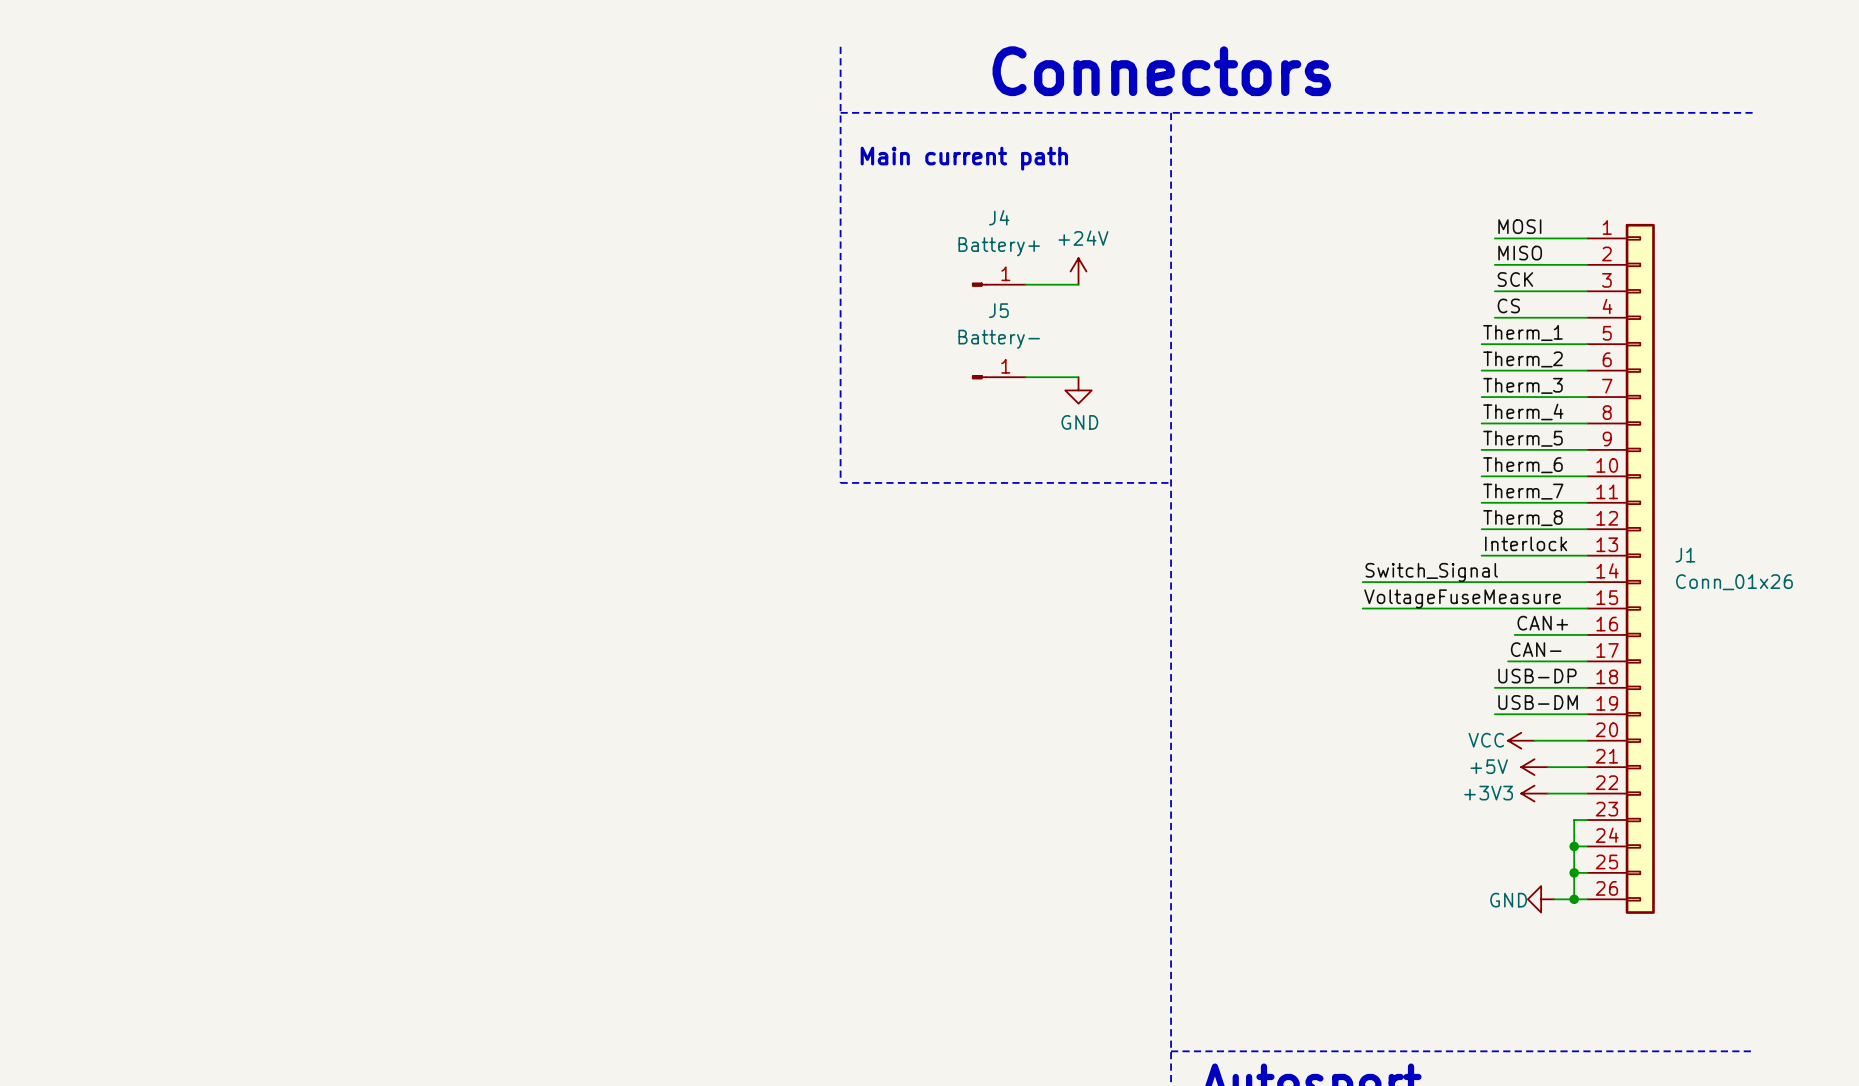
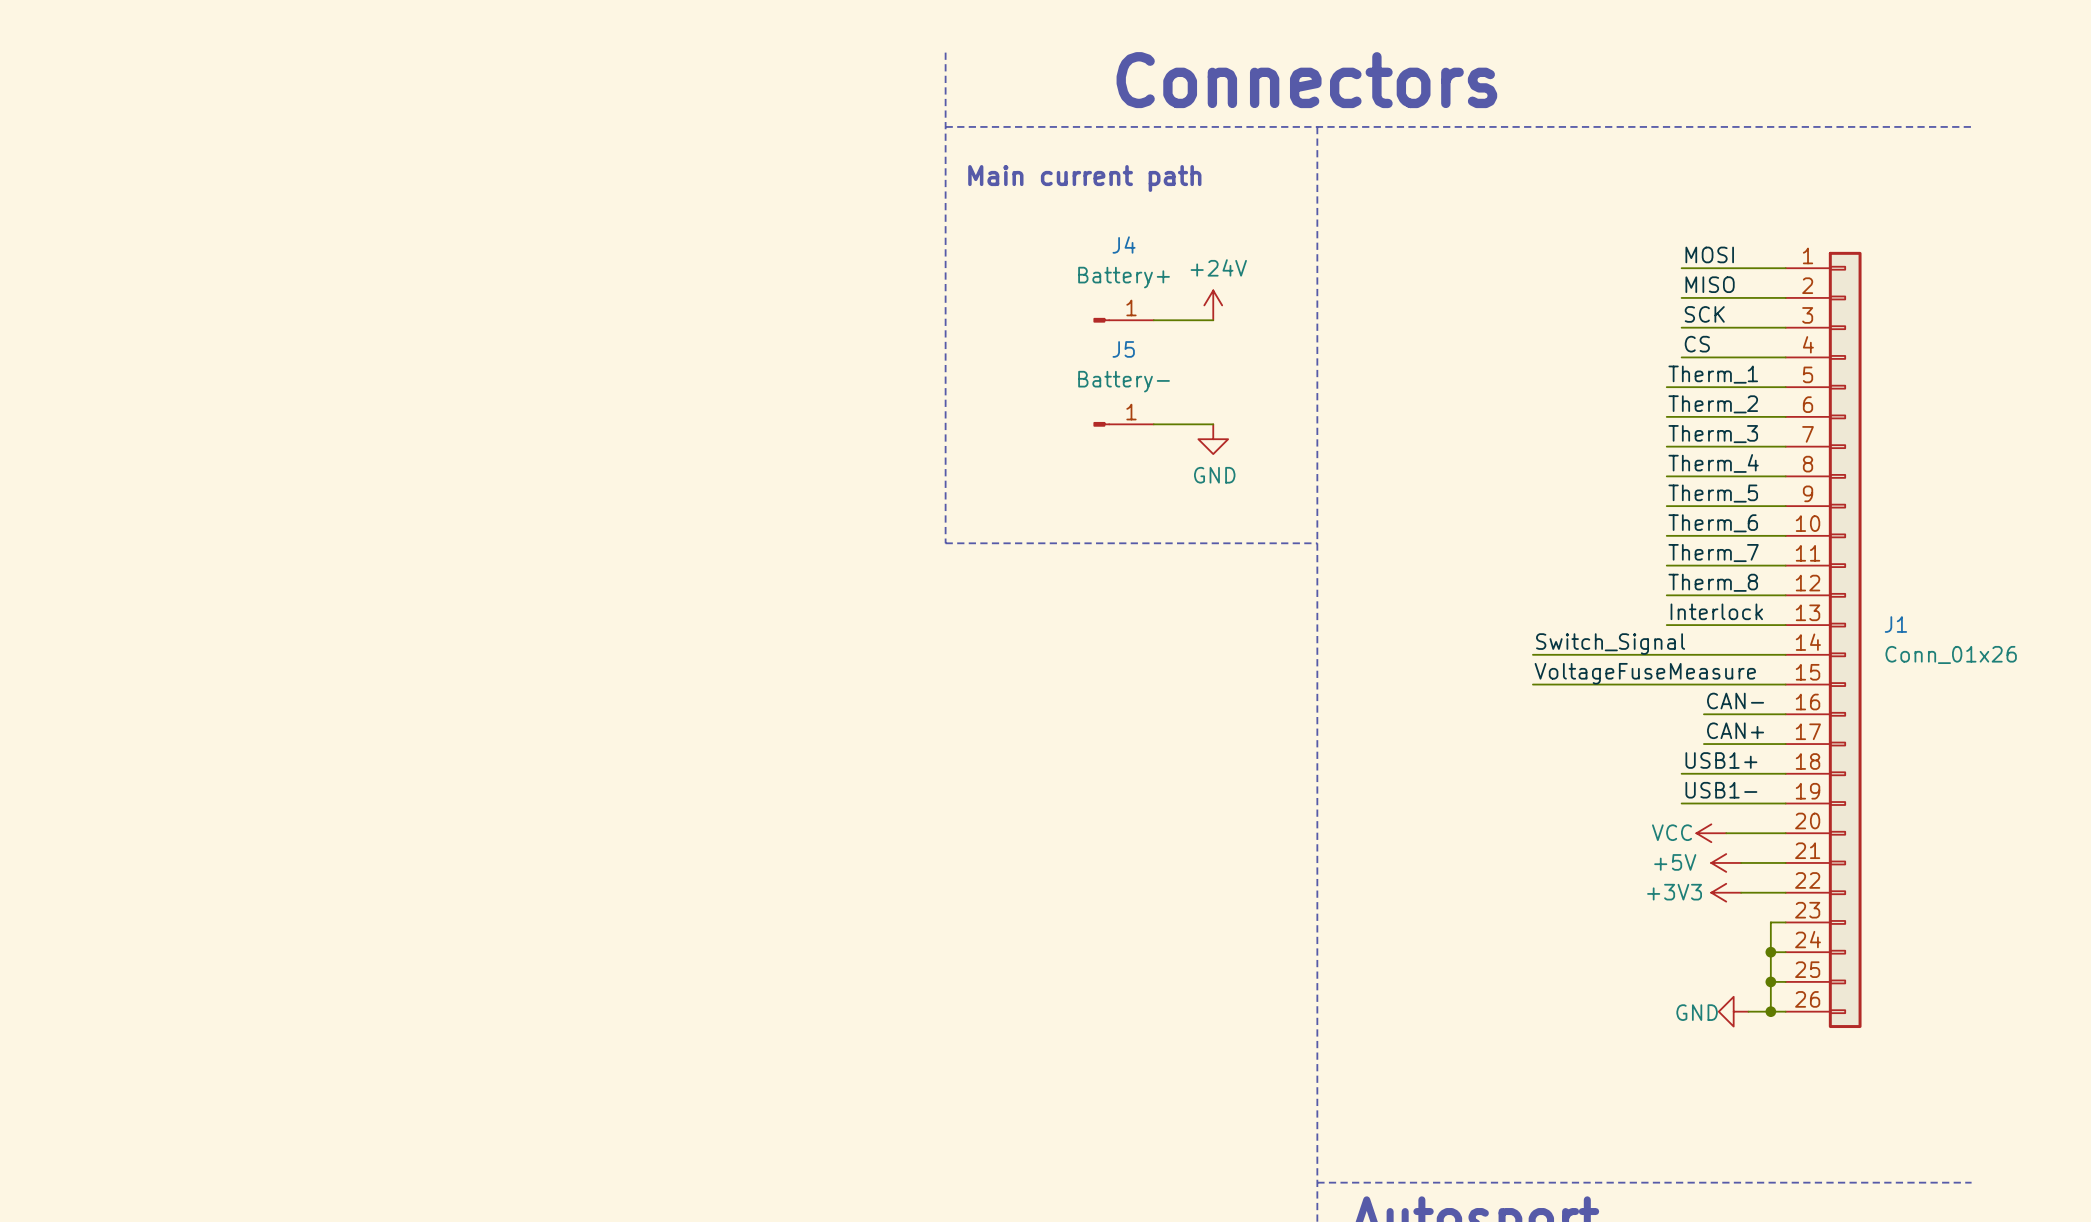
label: CAN+ (1542, 623) -> CAN- (1735, 701)
label: CAN- (1536, 649) -> CAN+ (1735, 730)
wire: (1508, 661) (1514, 661) -> none
label: USB-DP (1537, 676) -> USB1+ (1721, 760)
label: USB-DM (1538, 702) -> USB1- (1721, 790)

